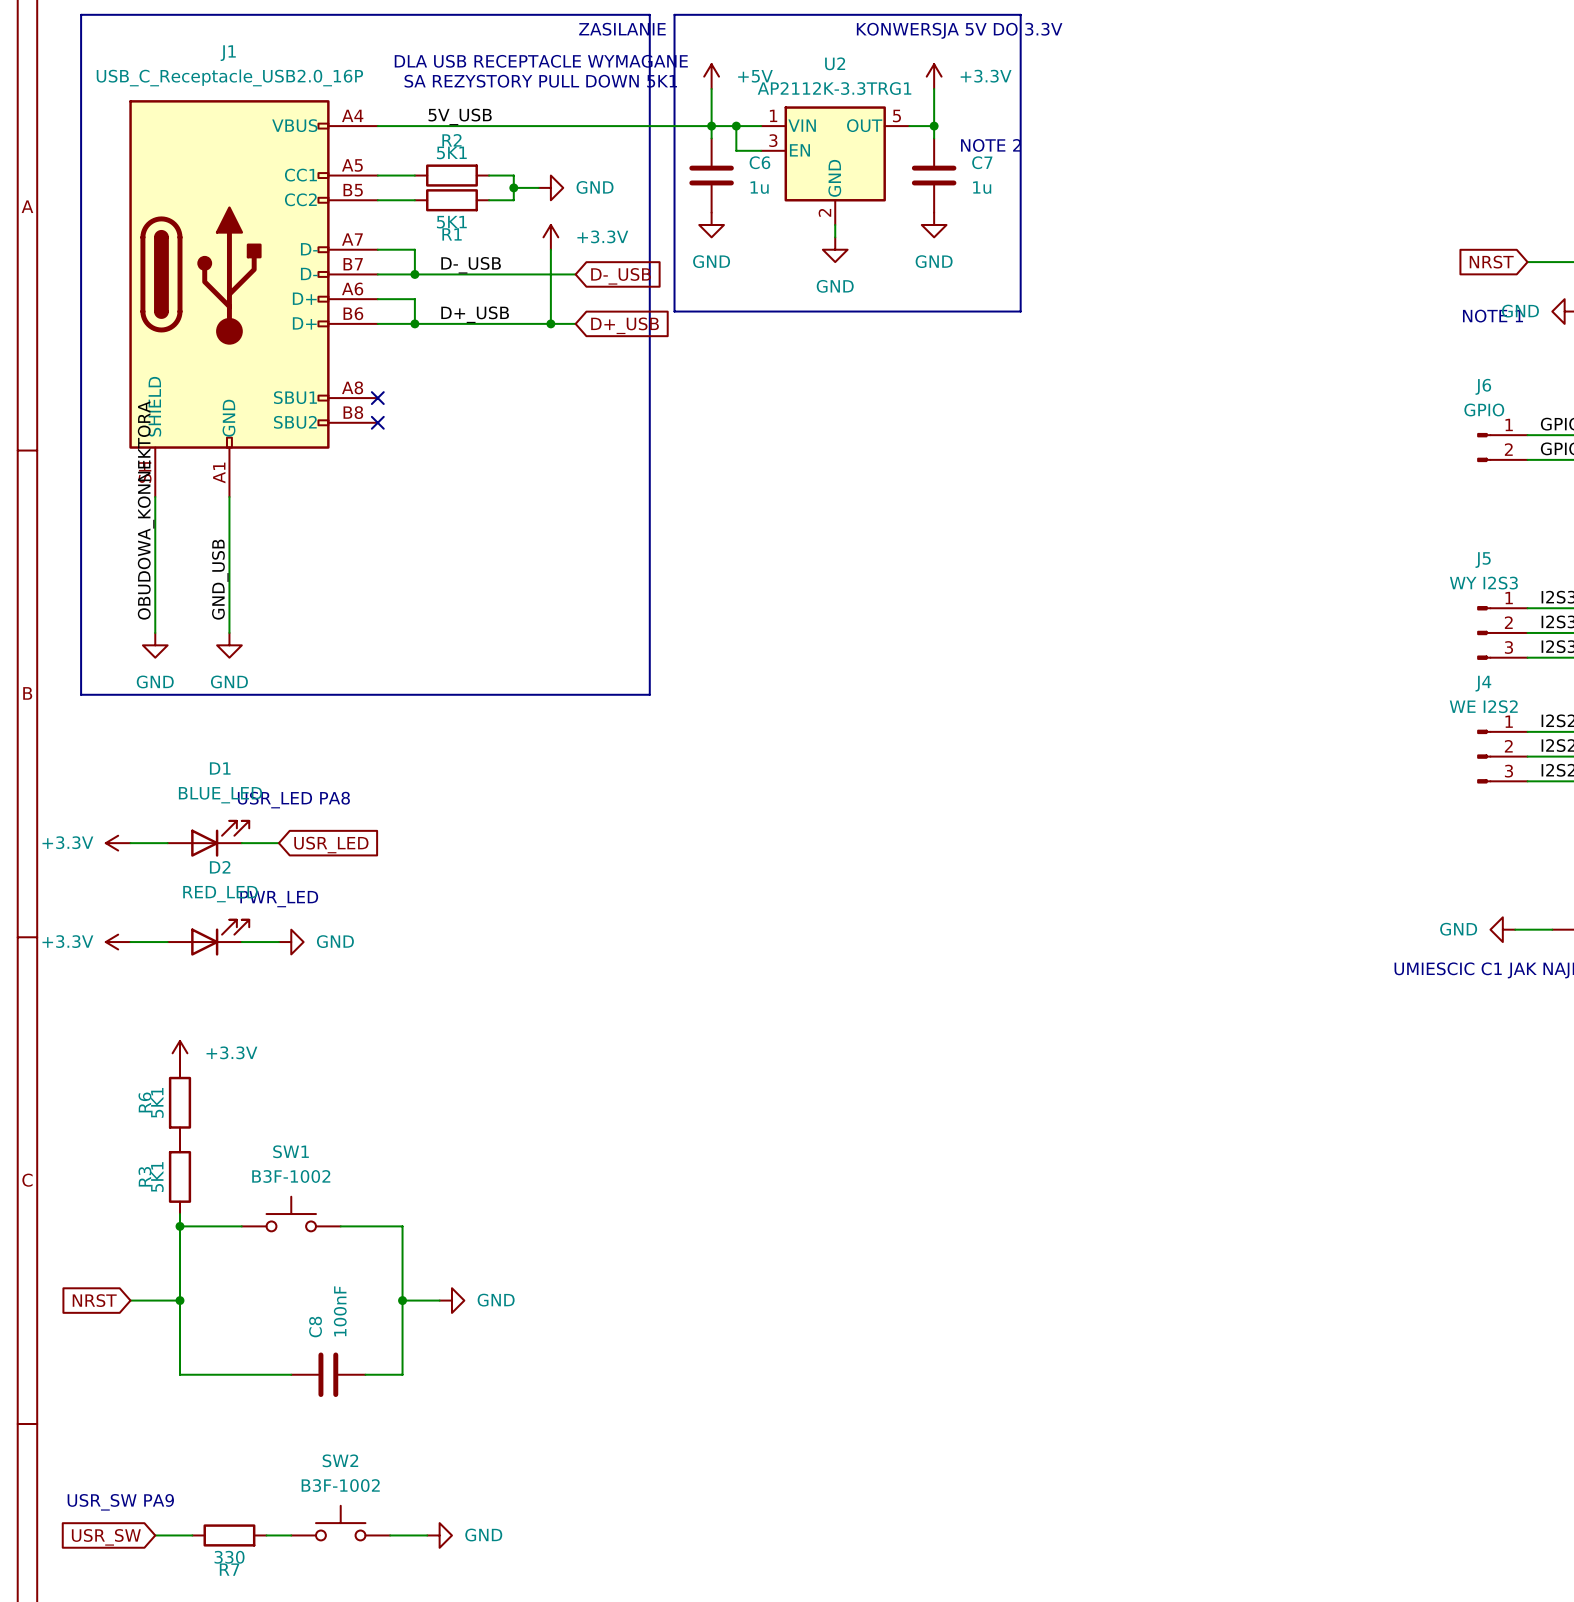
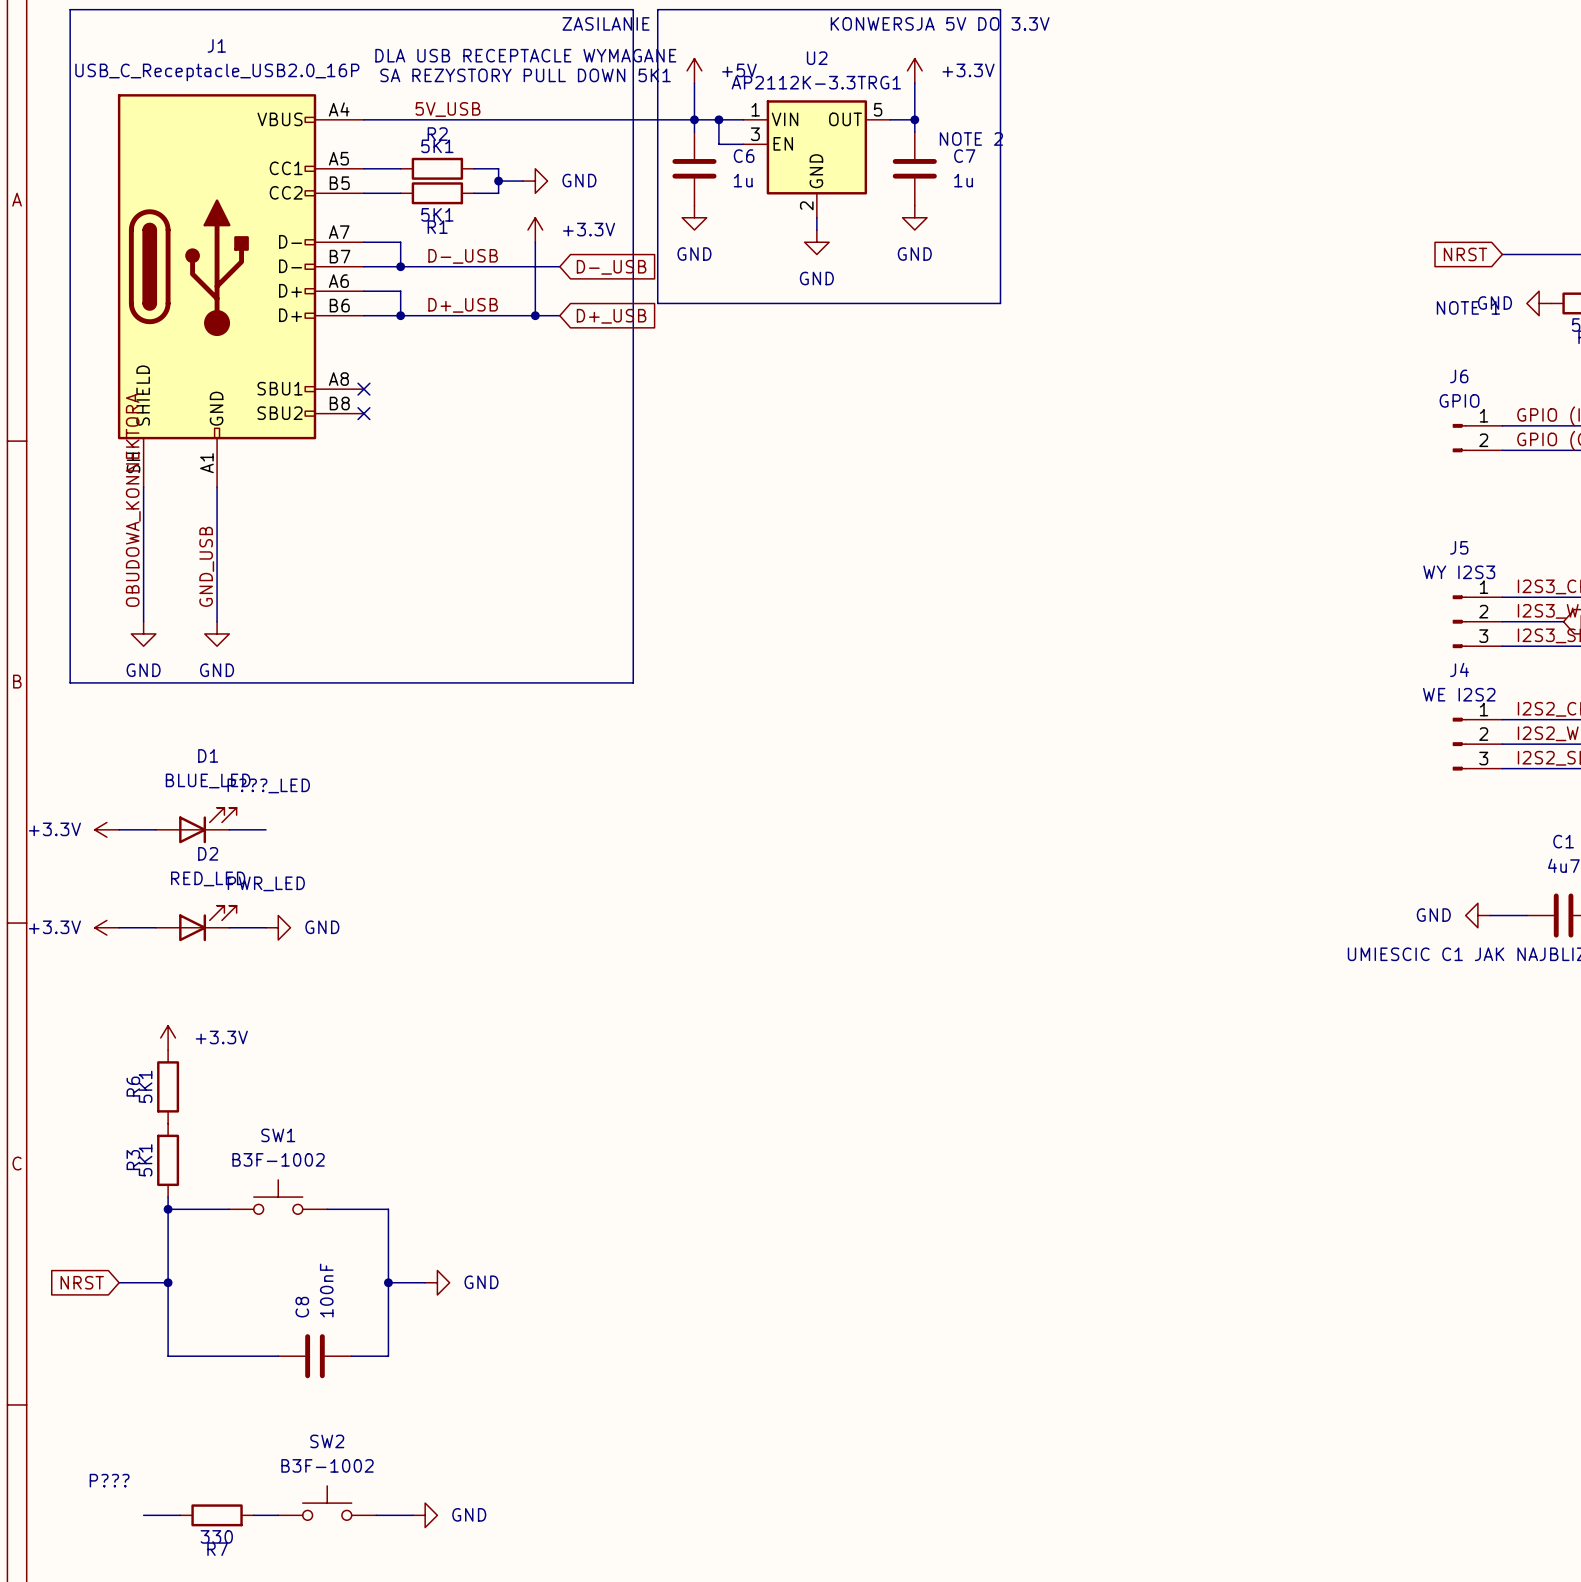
text: none -> P???_LED (268, 785)
text: USR_LED PA8 (293, 800) -> none
global label: USR_LED (331, 845) -> none
text: USR_SW PA9 (120, 1502) -> P??? (109, 1480)
global label: USR_SW (106, 1537) -> none

